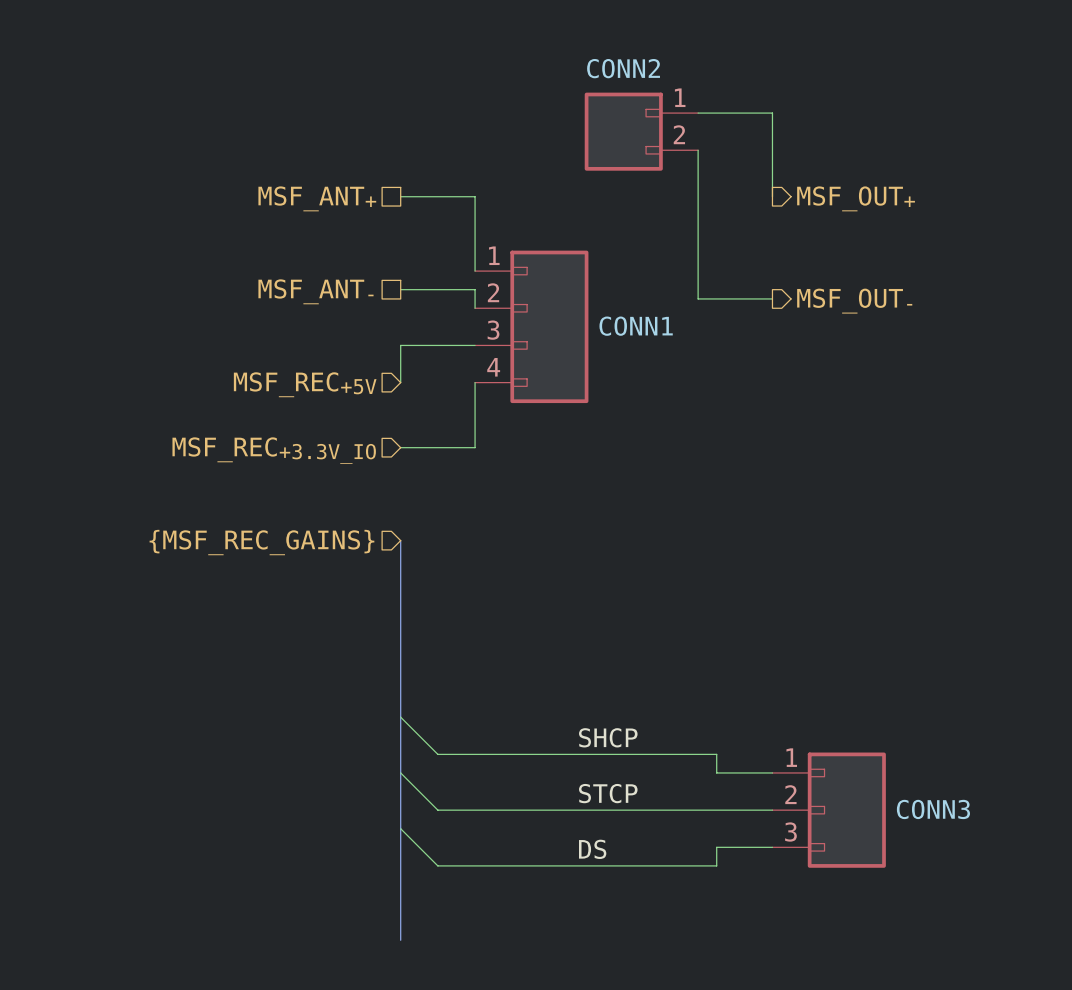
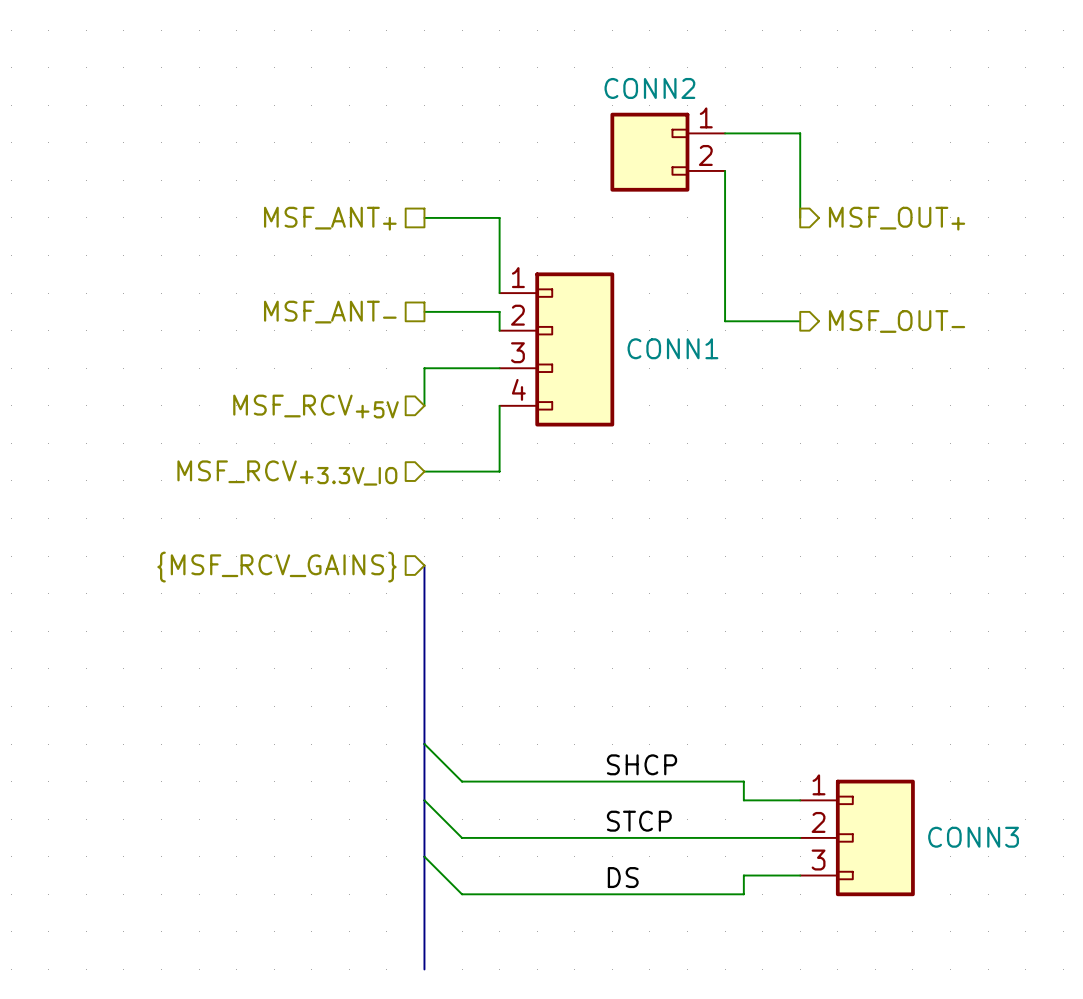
hierarchical label: MSF_REC+5V (305, 384) -> MSF_RCV+5V (316, 406)
hierarchical label: MSF_REC+3.3V_IO (274, 450) -> MSF_RCV+3.3V_IO (287, 473)
hierarchical label: {MSF_REC_GAINS} (261, 542) -> {MSF_RCV_GAINS} (277, 567)

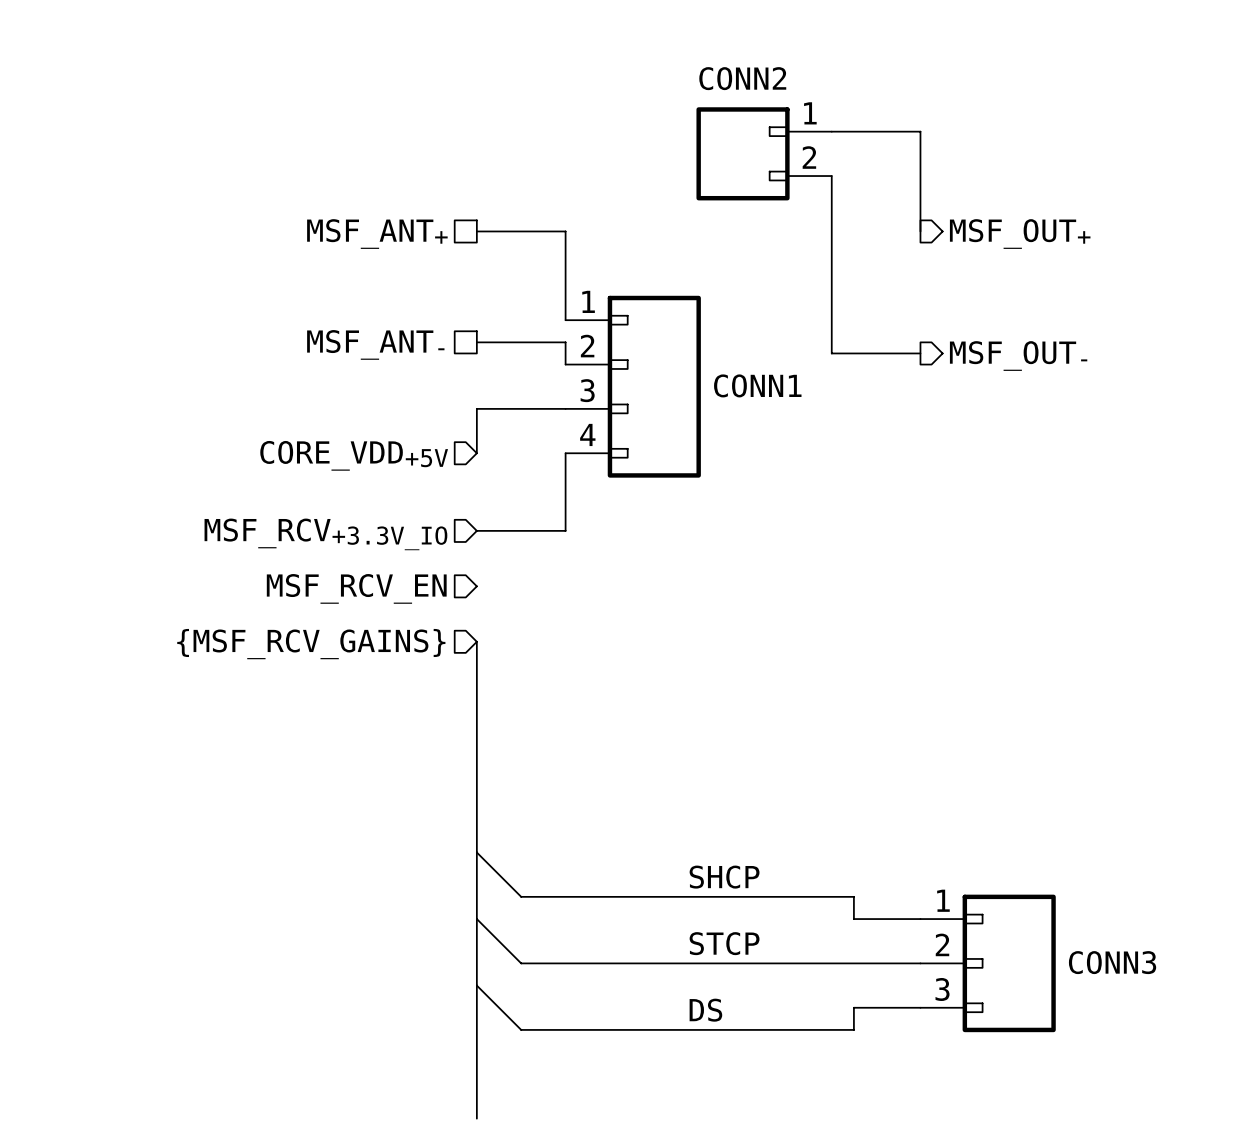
hierarchical label: MSF_RCV+5V (316, 406) -> CORE_VDD+5V (354, 455)
hierarchical label: none -> MSF_RCV_EN (356, 588)

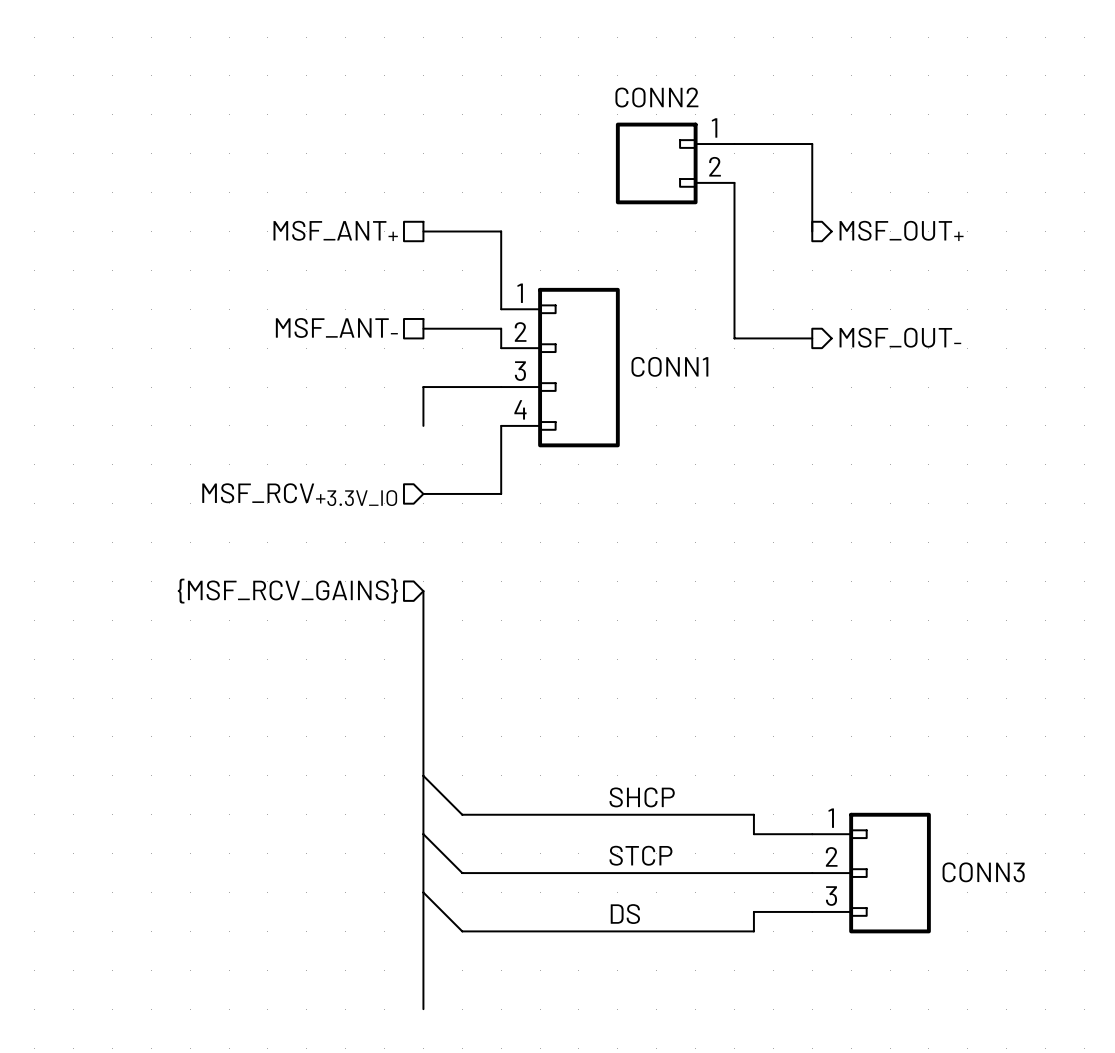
hierarchical label: CORE_VDD+5V (354, 455) -> none
hierarchical label: MSF_RCV_EN (356, 588) -> none

